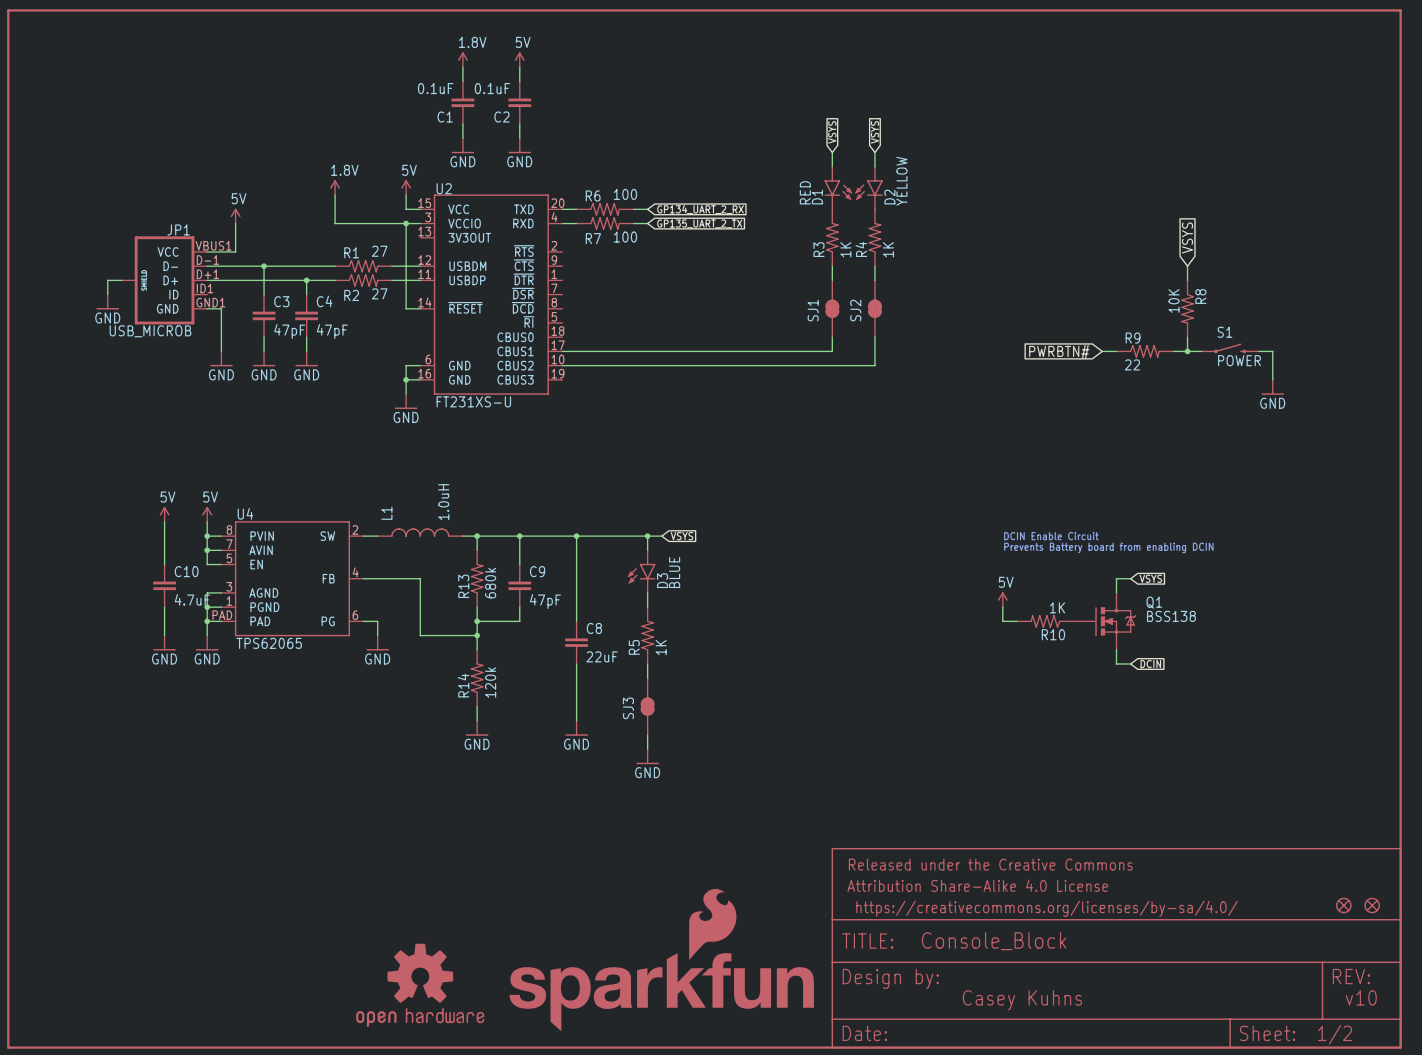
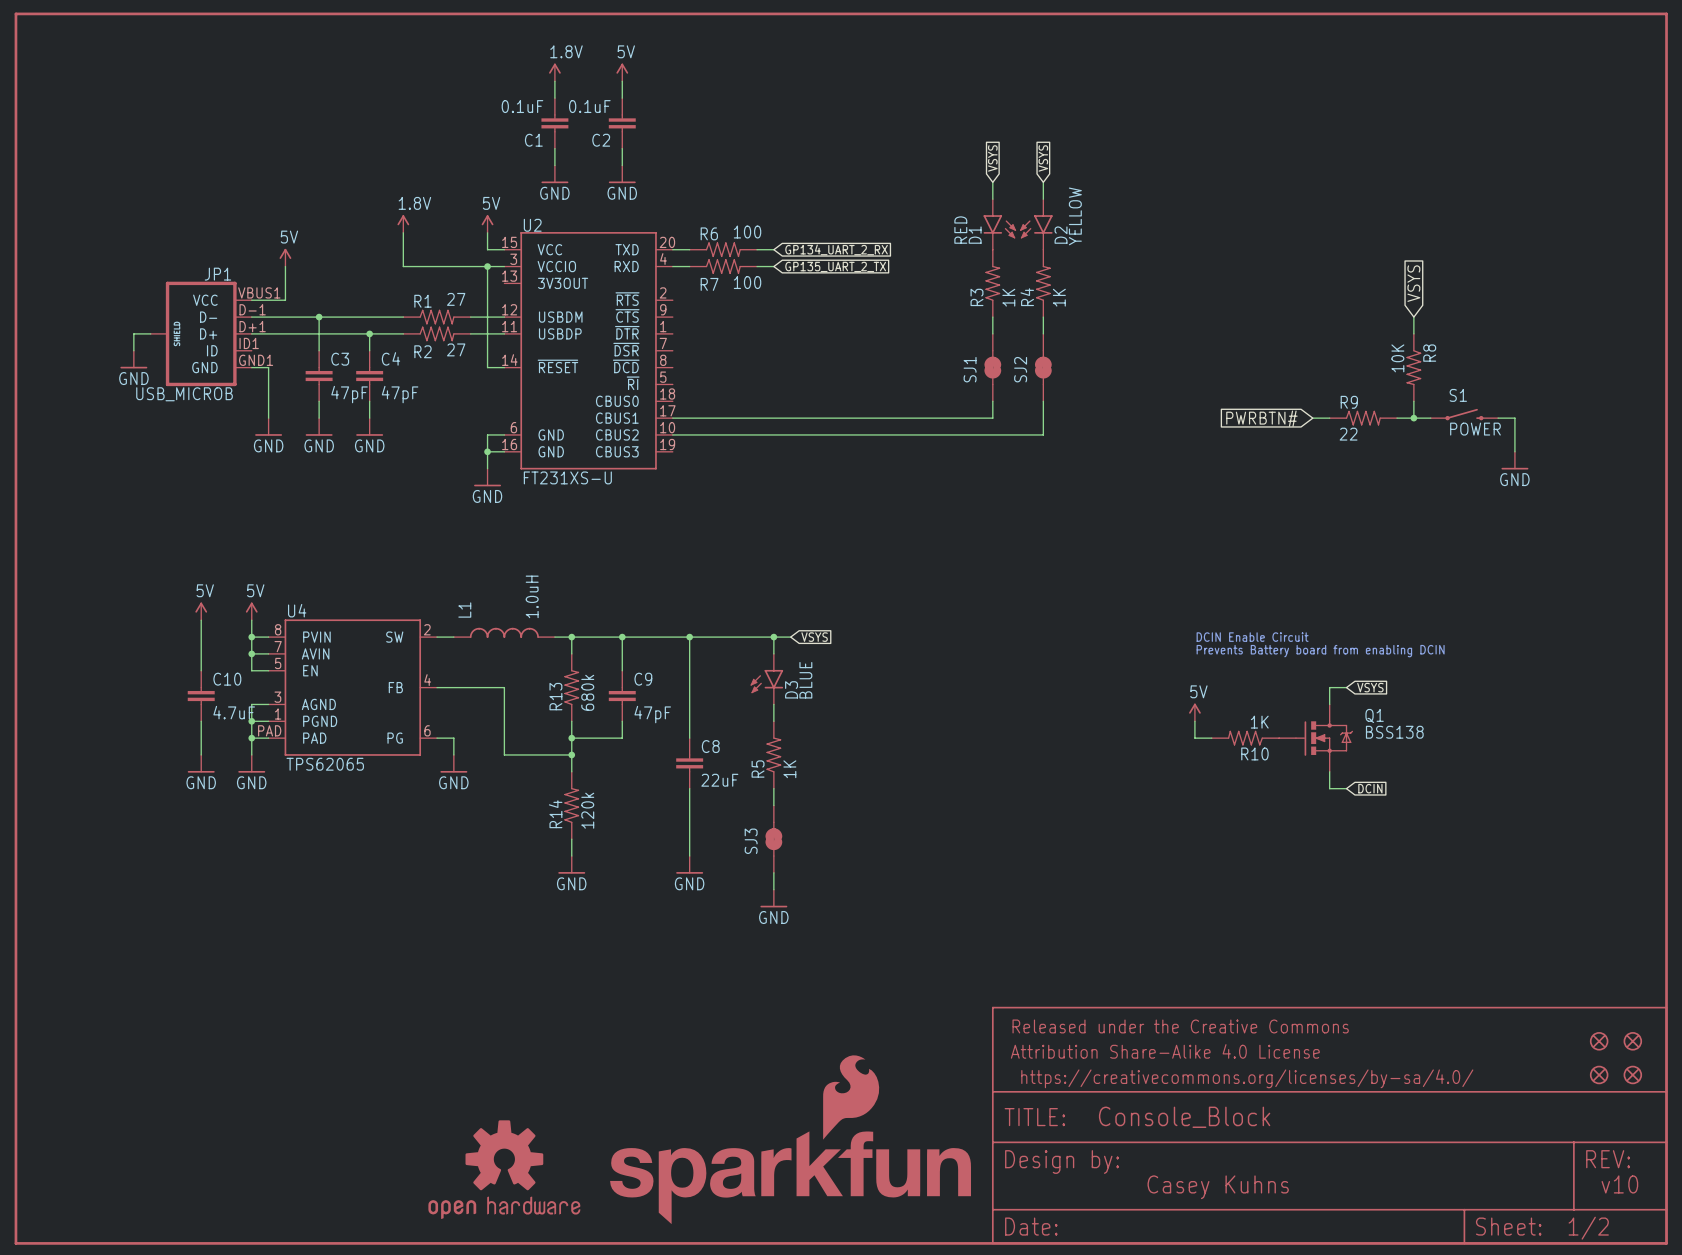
part: none -> (1599, 1041)
part: none -> (1632, 1041)

